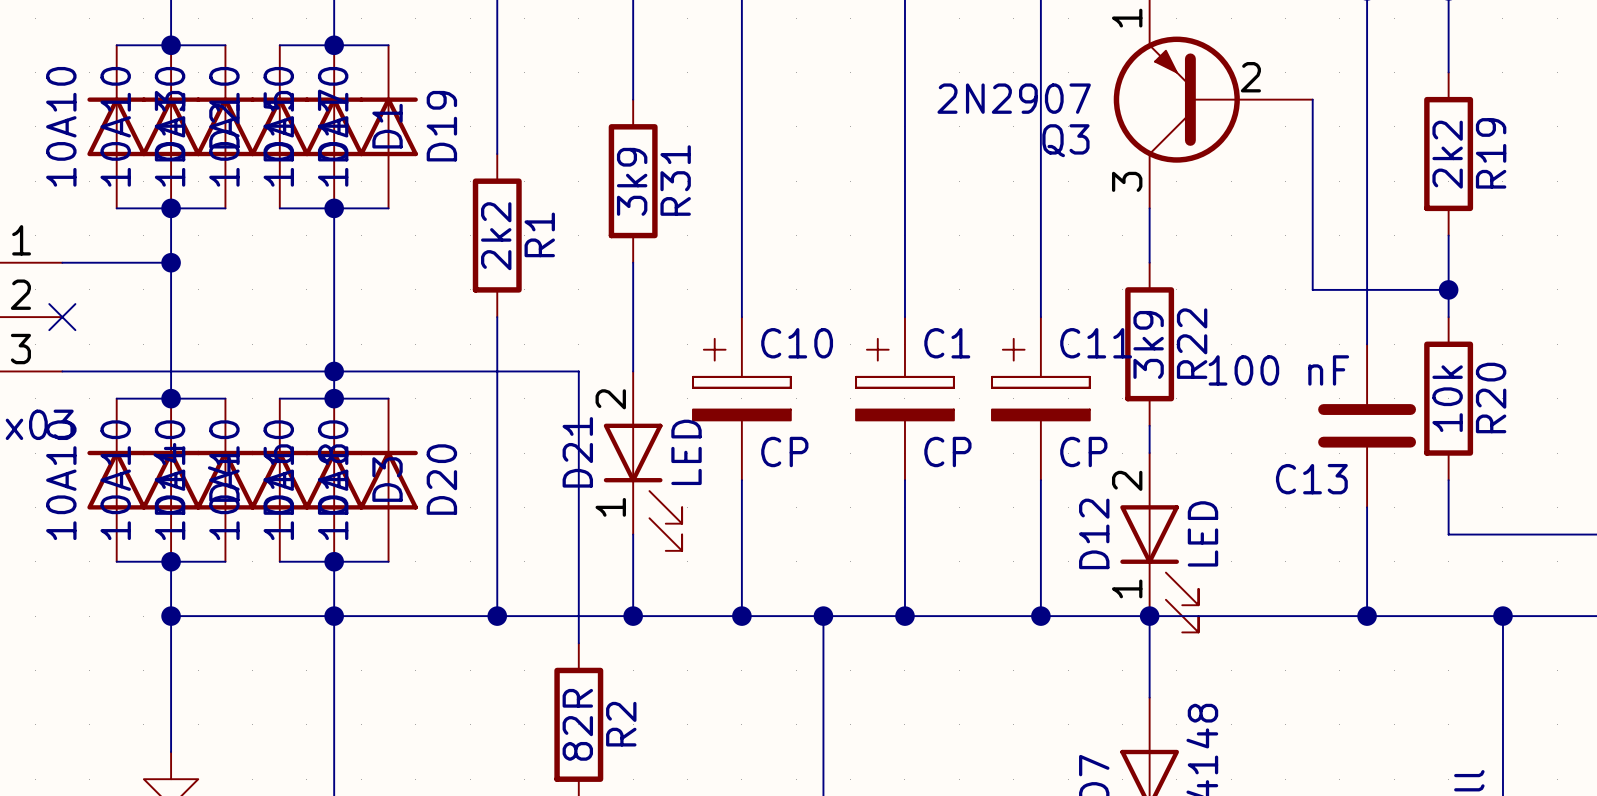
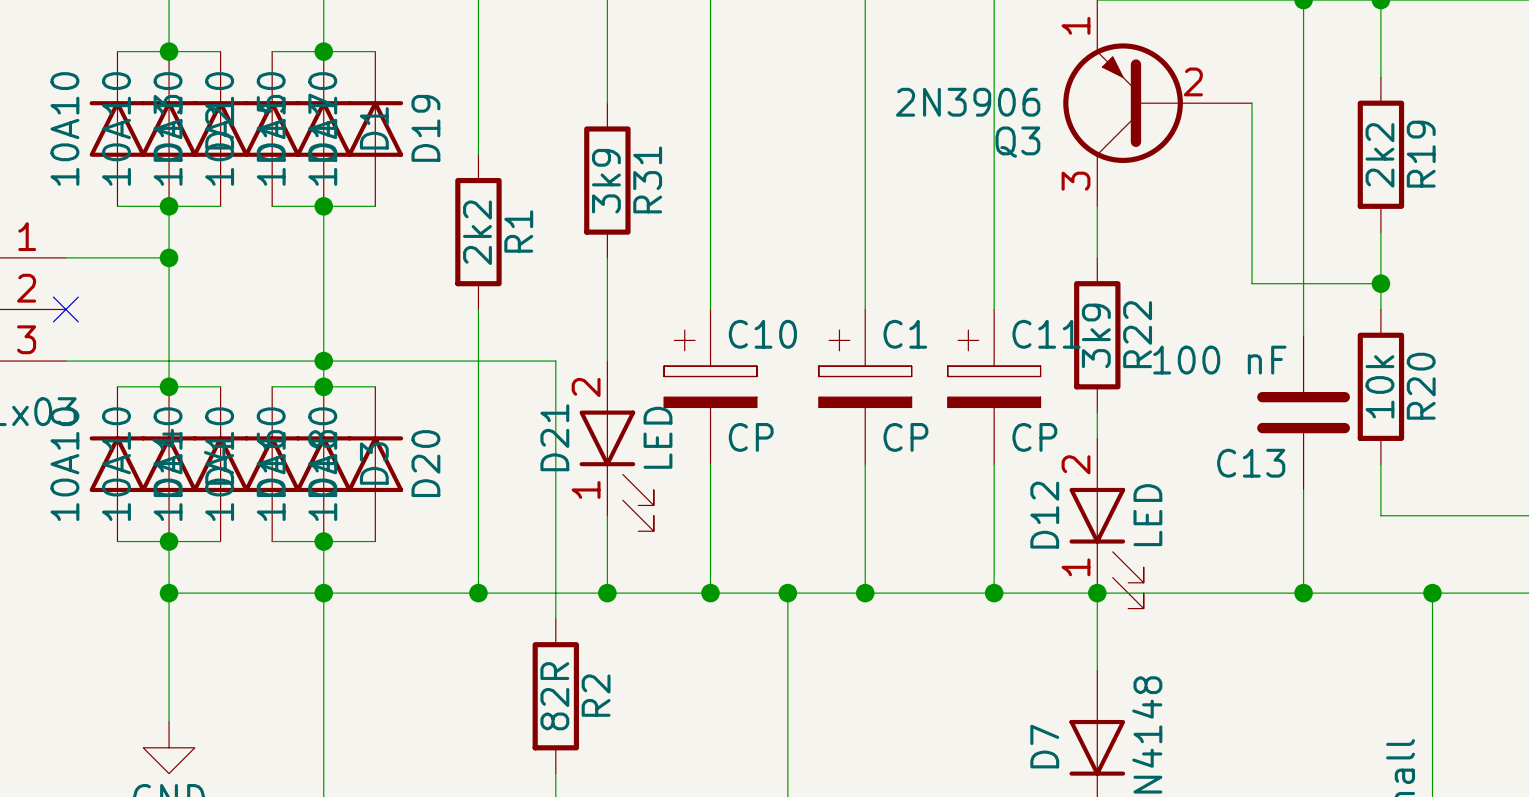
Q3 value: 2N2907 (1014, 98) -> 2N3906 (968, 102)

